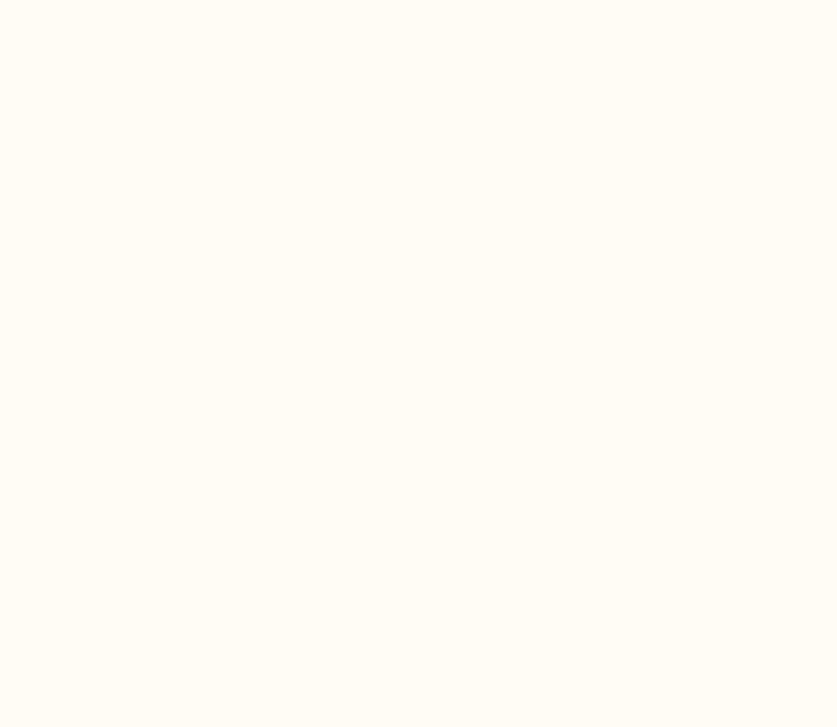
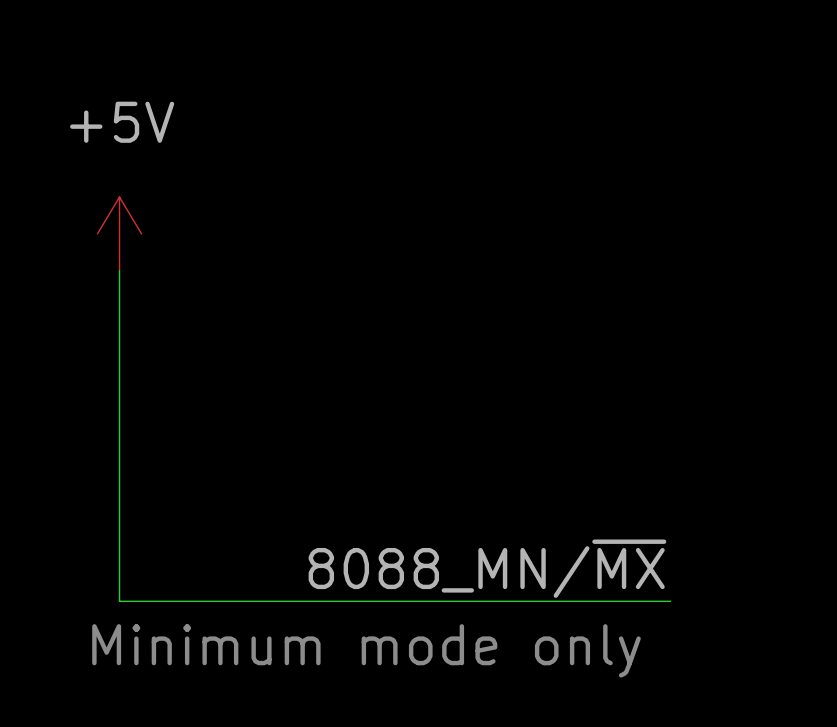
power symbol: none -> +5V (119, 233)
wire: none -> (119, 270) (119, 601) (670, 601)
label: none -> 8088_MN/~{MX} (487, 568)
text: none -> Minimum mode only (366, 650)

